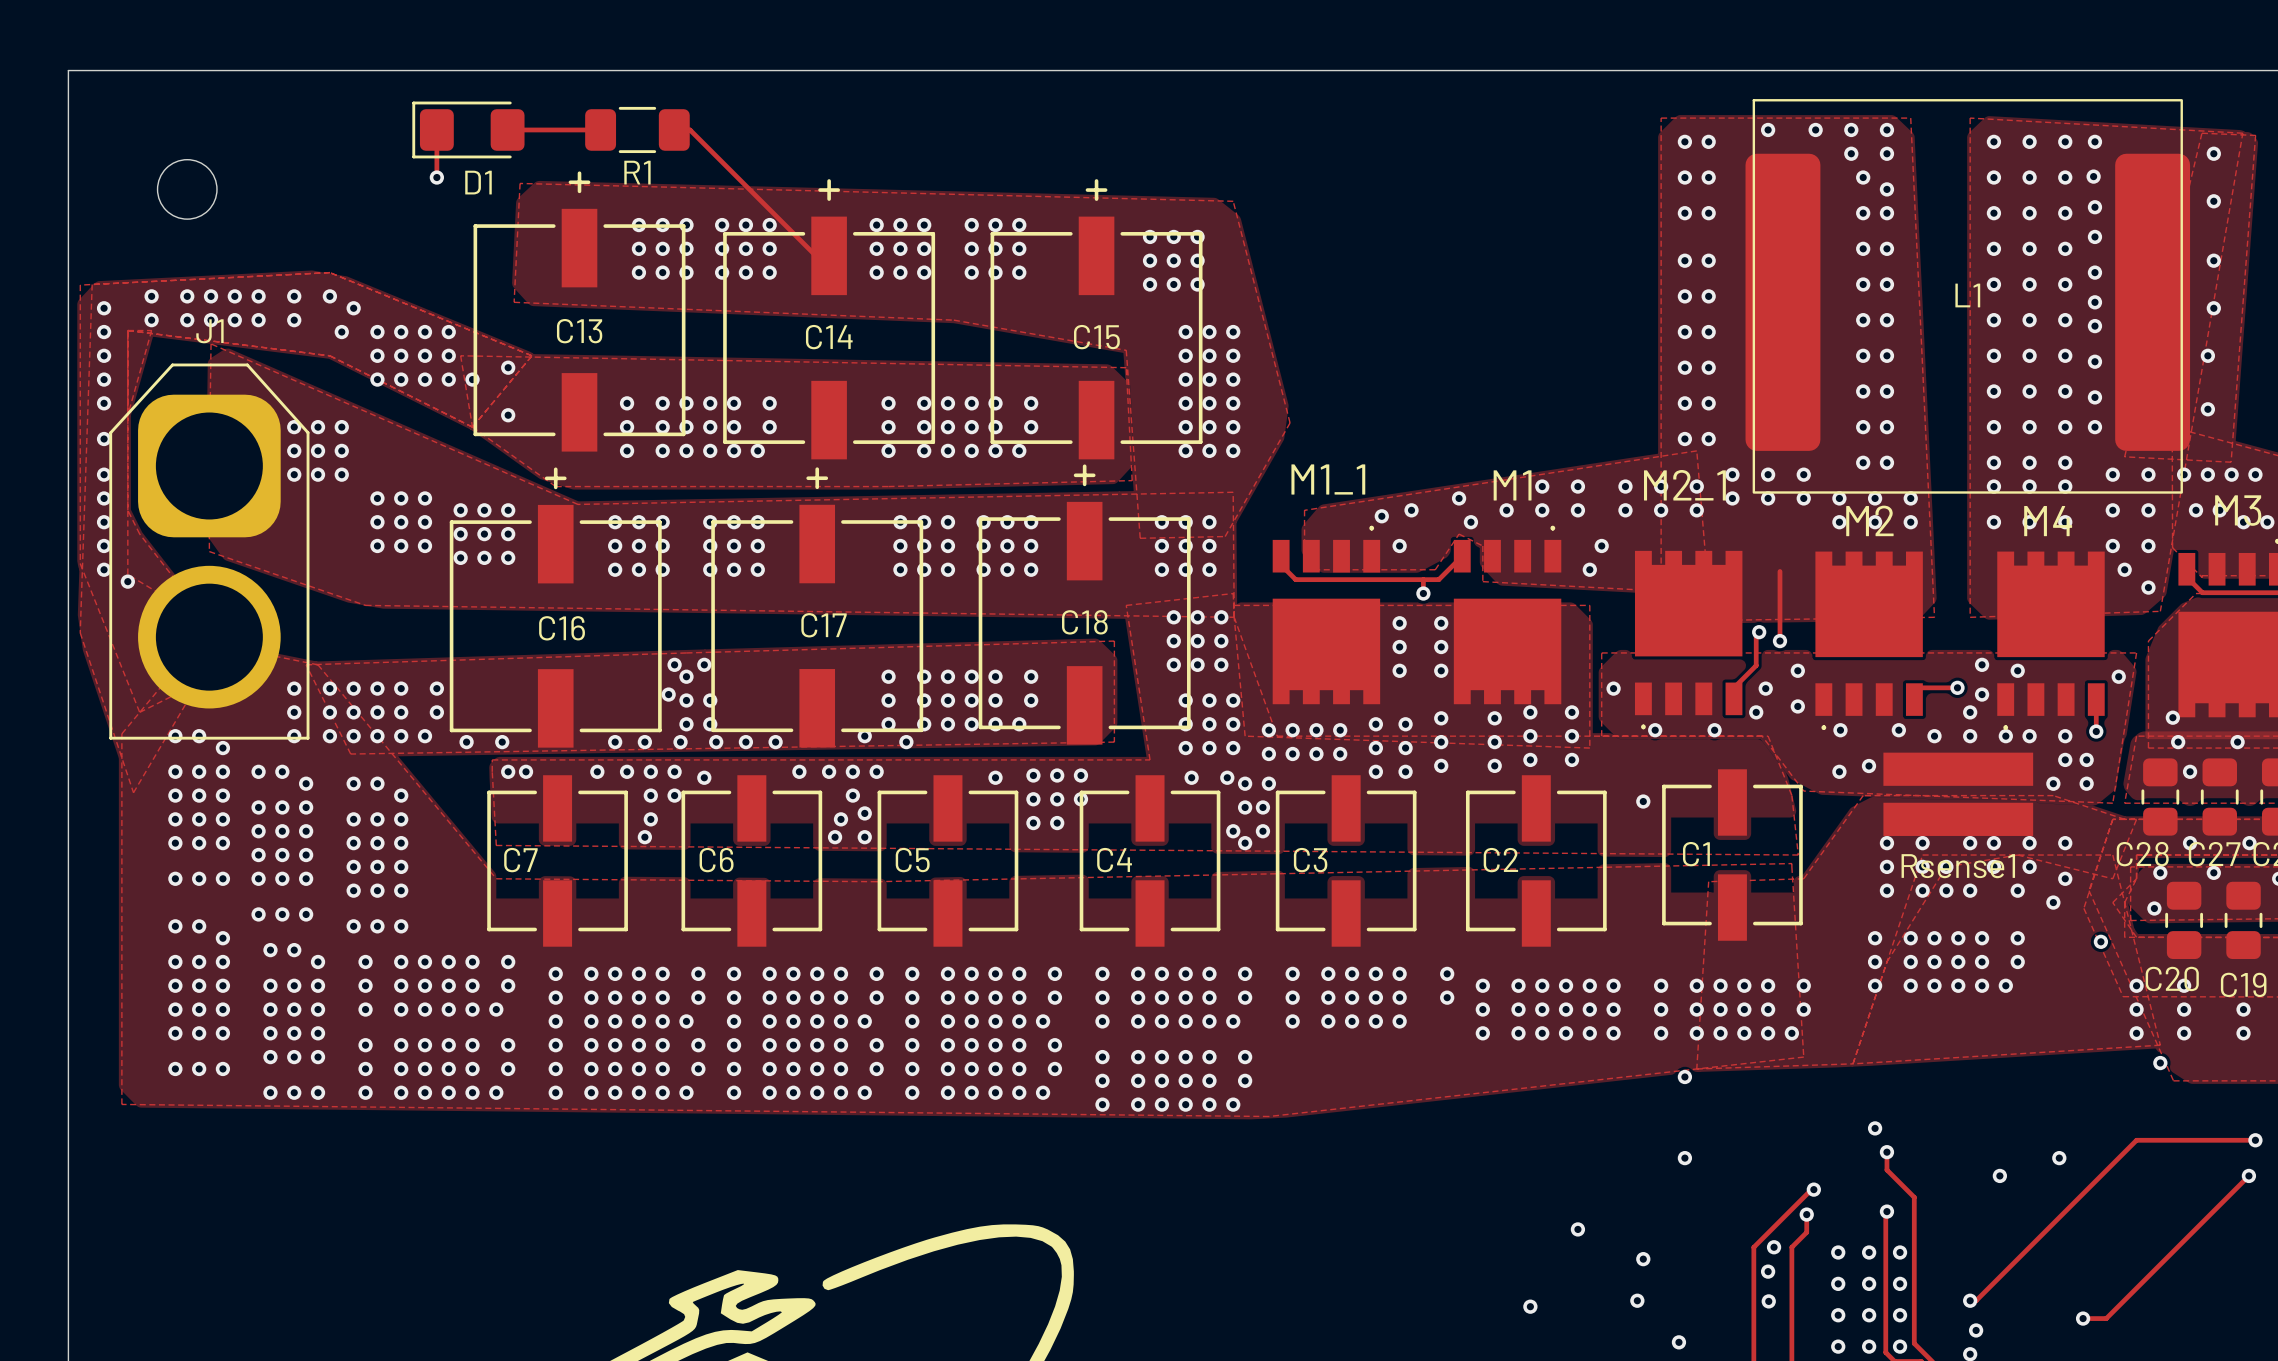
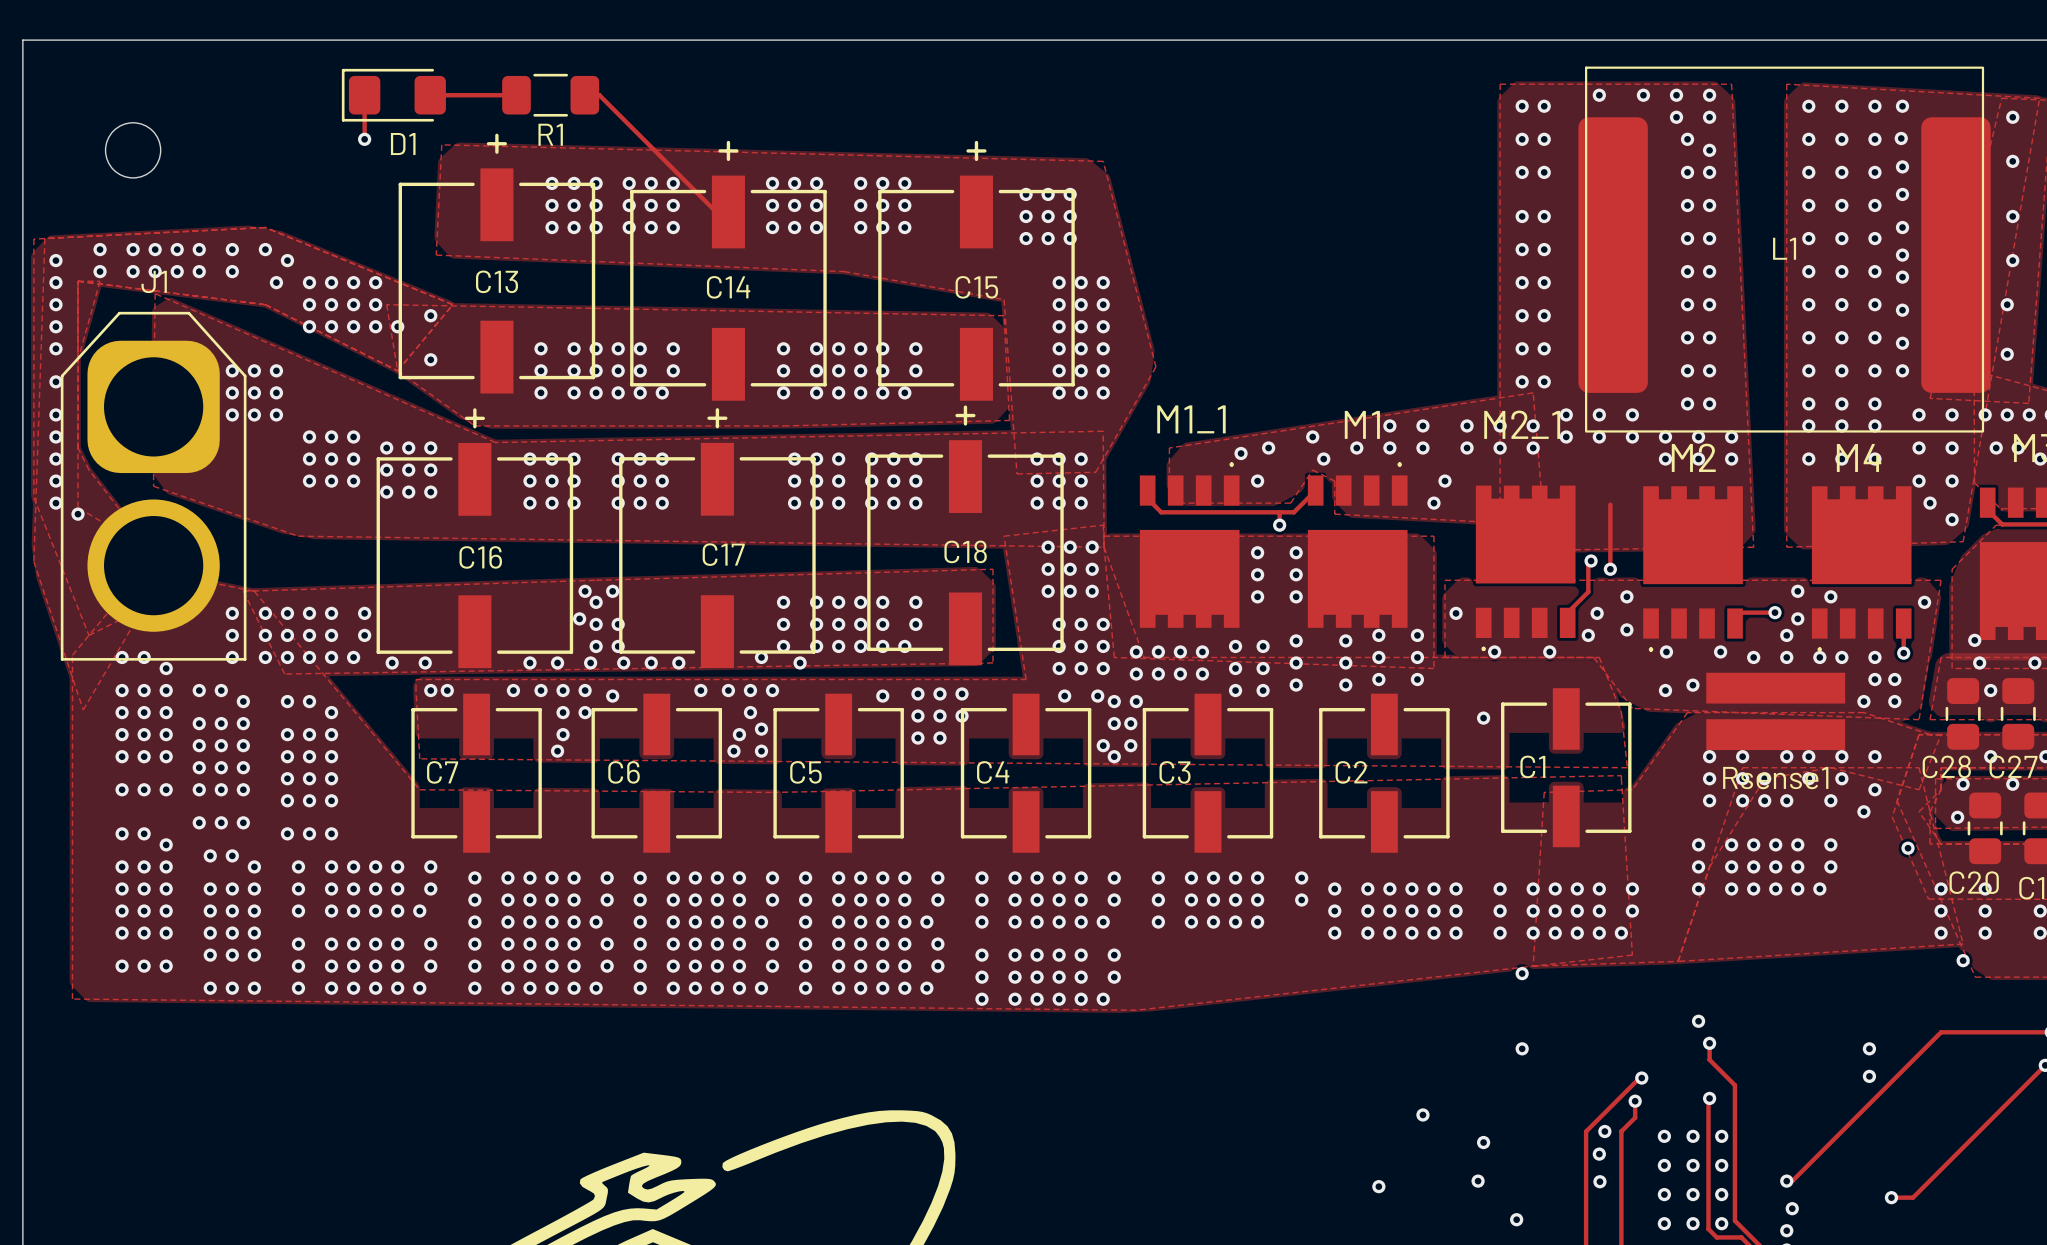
via position: (1999, 1175) -> (1869, 1076)

